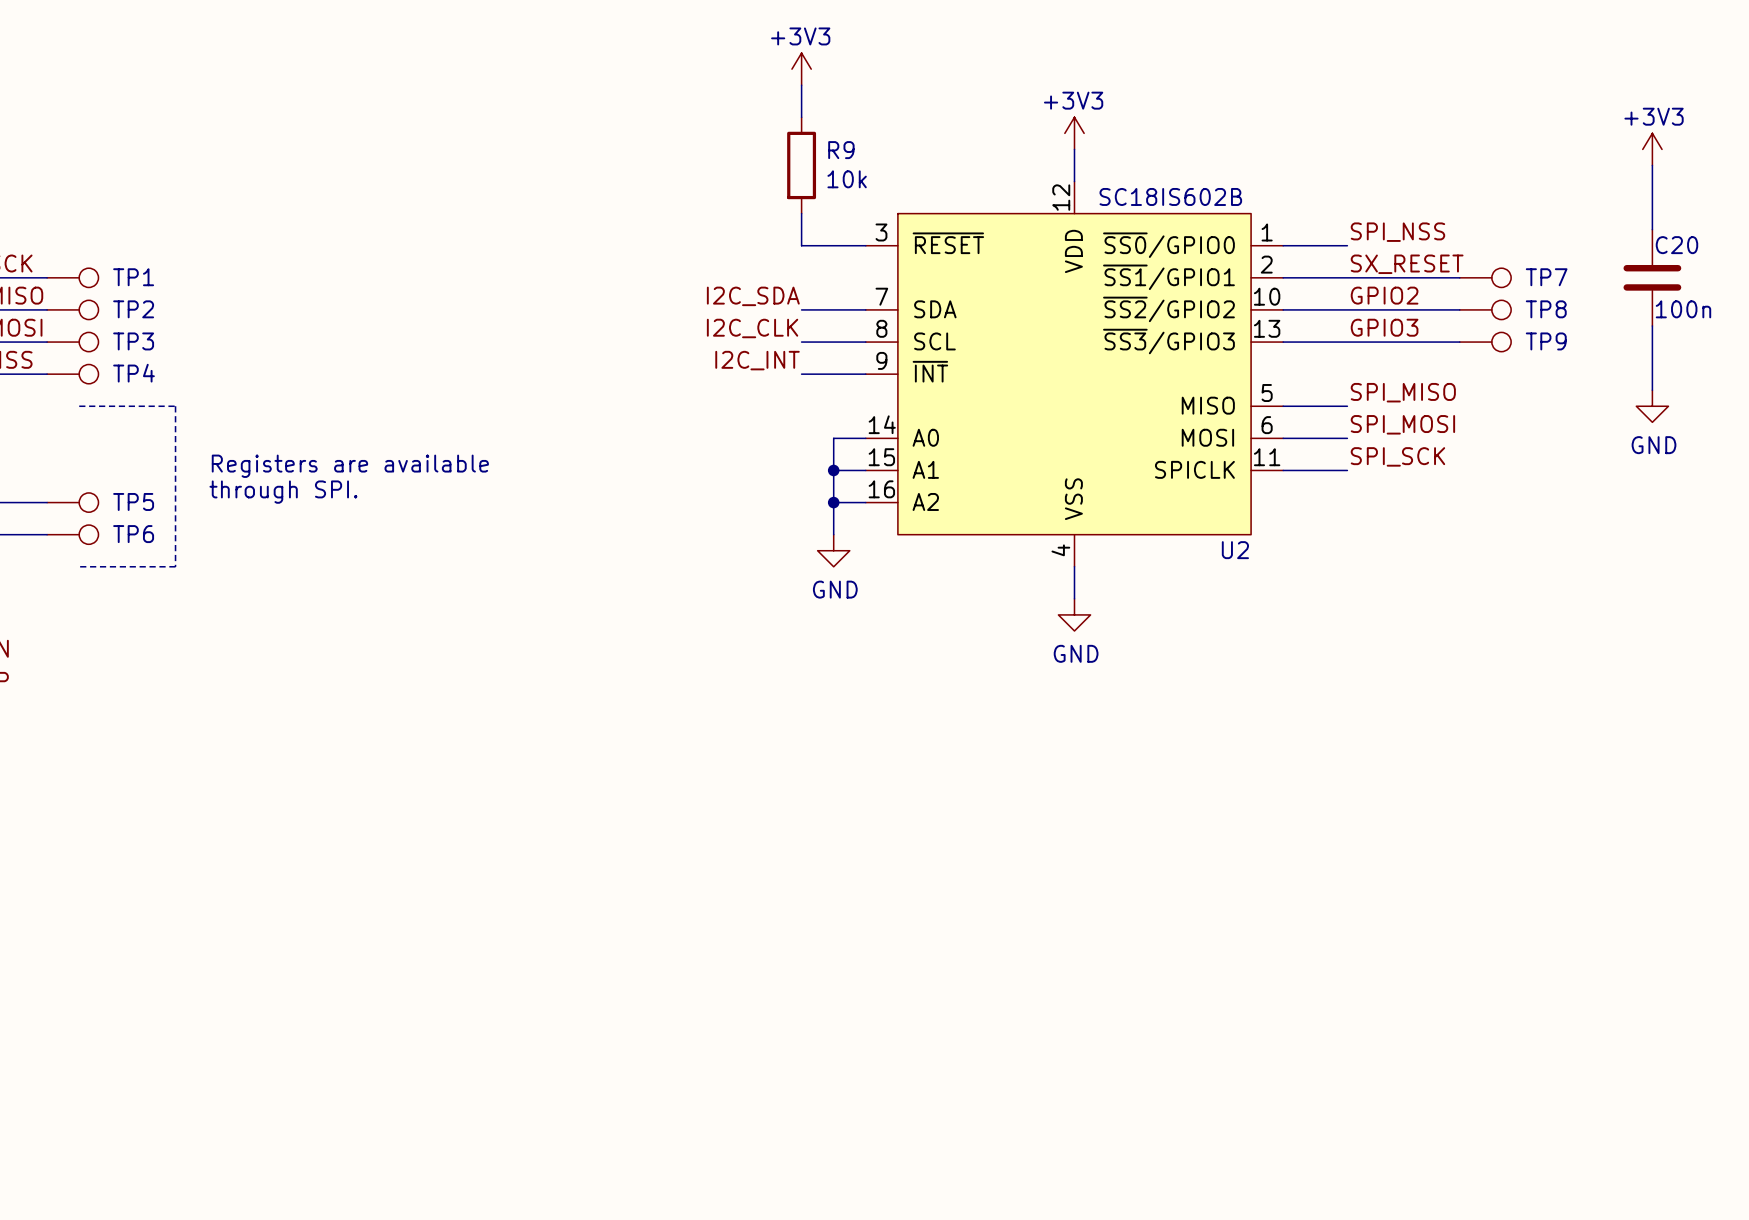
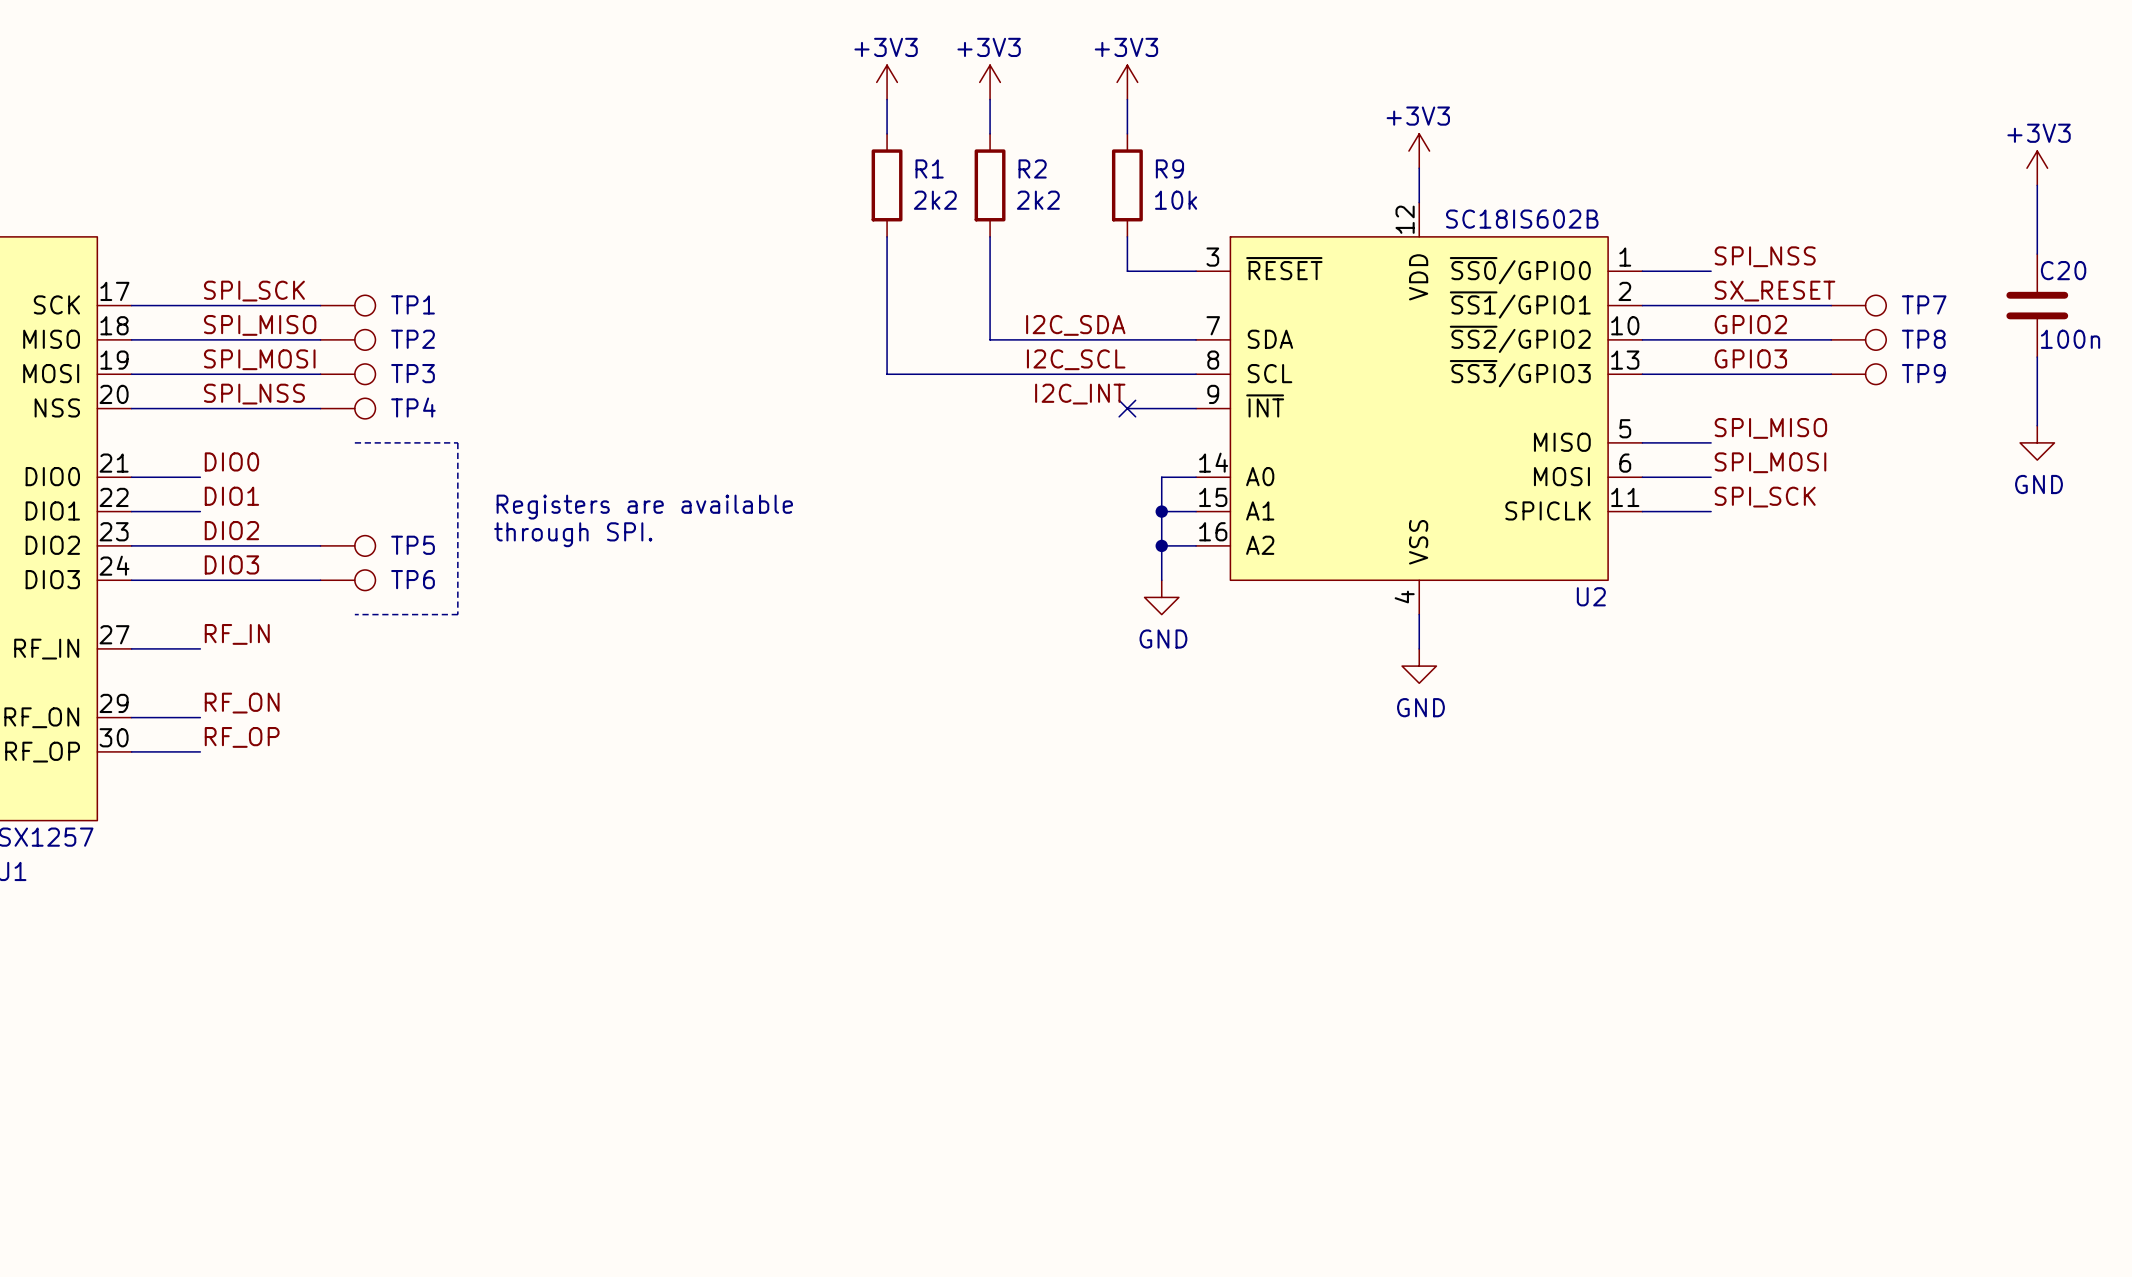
power symbol: none -> +3V3 (887, 82)
power symbol: none -> +3V3 (990, 82)
wire: none -> (887, 99) (887, 133)
wire: none -> (990, 99) (990, 133)
R1: none -> 2k2 (887, 185)
R2: none -> 2k2 (990, 185)
wire: none -> (887, 236) (887, 374) (1127, 374)
wire: none -> (990, 236) (990, 339) (1127, 339)
label: I2C_CLK (752, 328) -> I2C_SCL (1076, 359)
no-connect mark: none -> (1127, 408)

